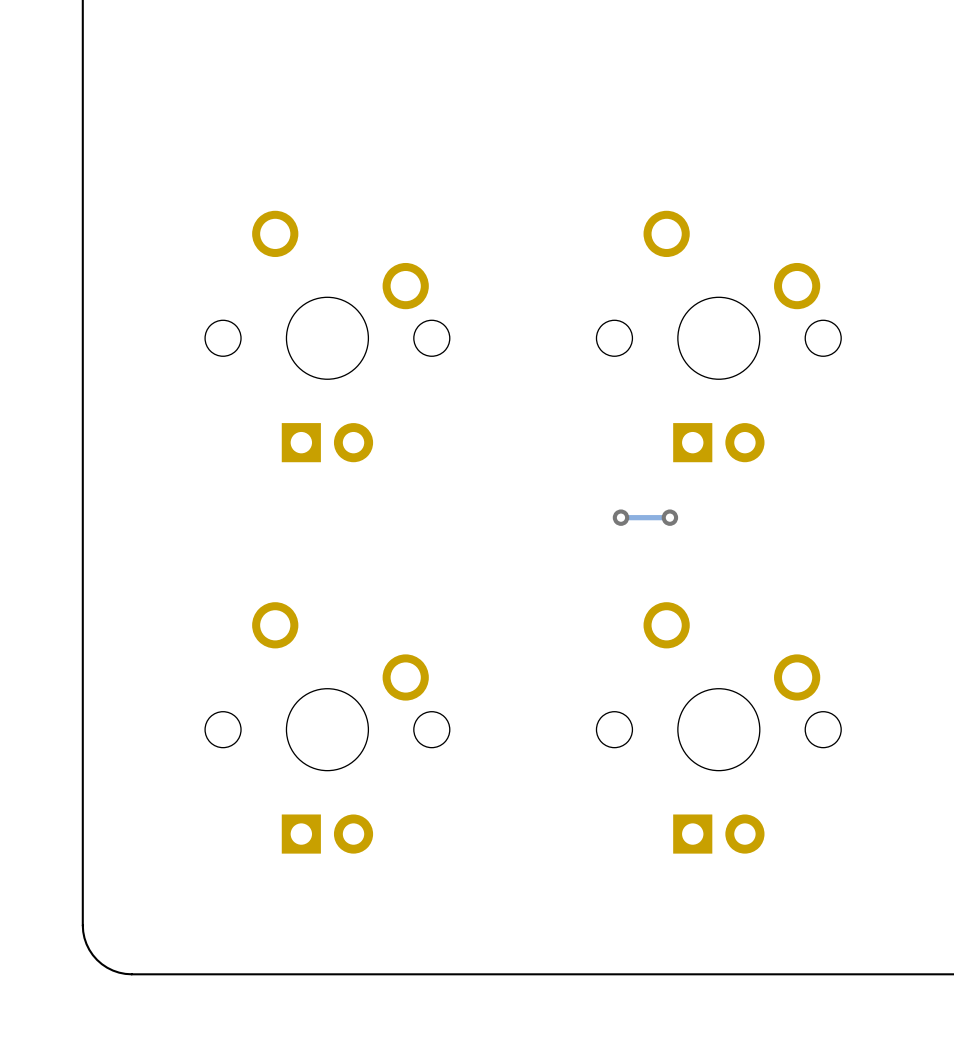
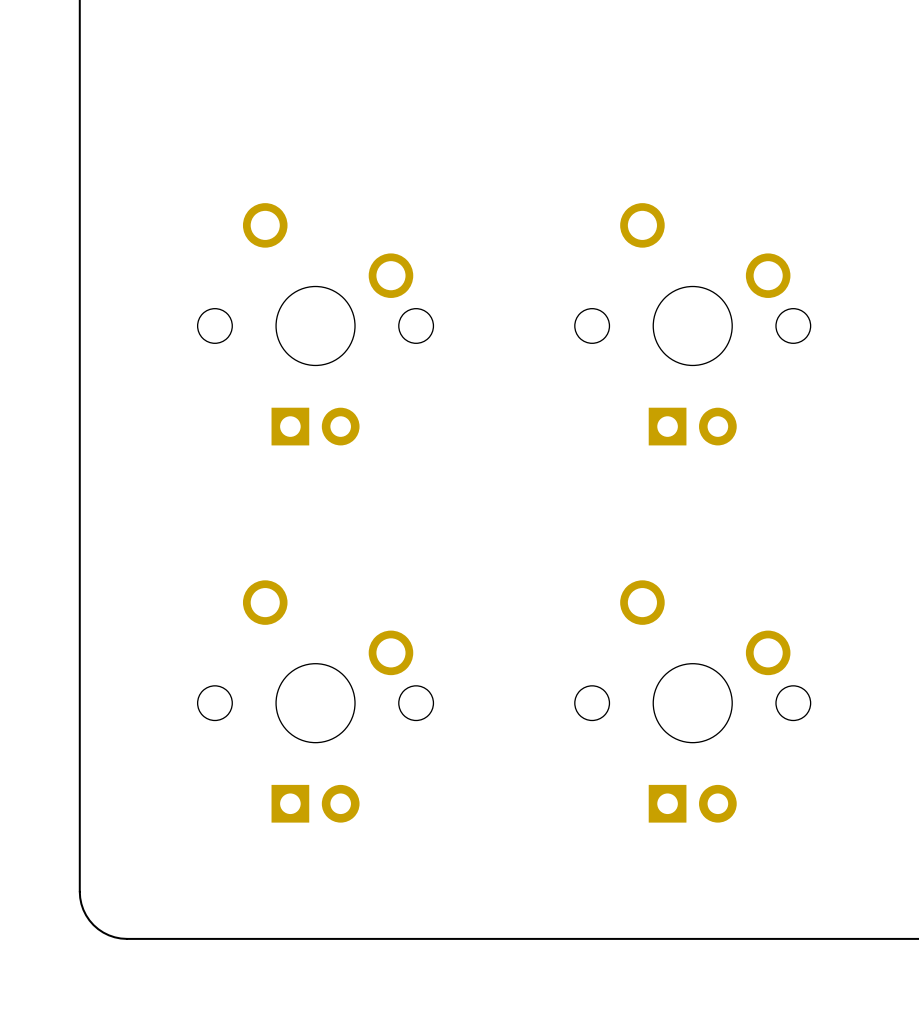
via: (620, 517) -> none
track: (669, 517) (620, 517) -> none
via: (669, 517) -> none

